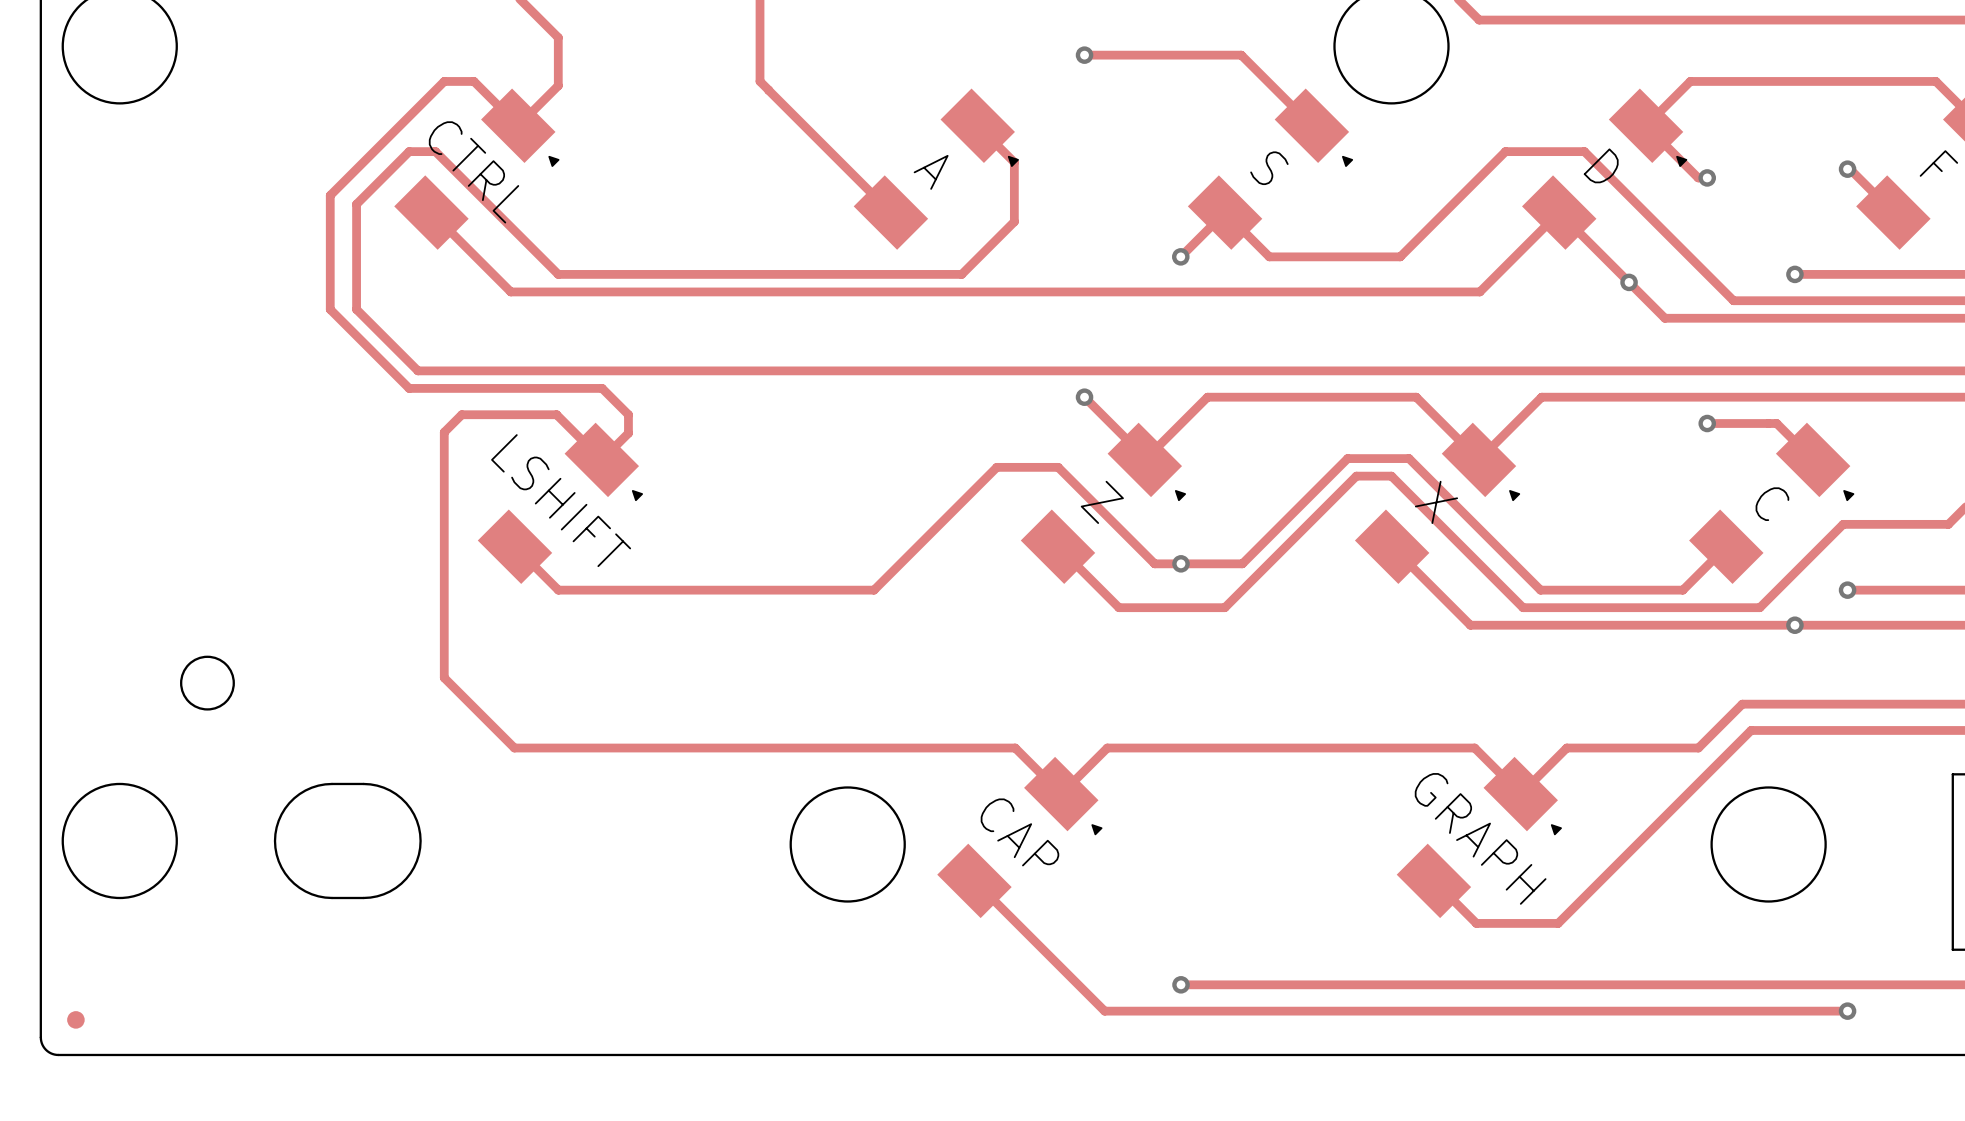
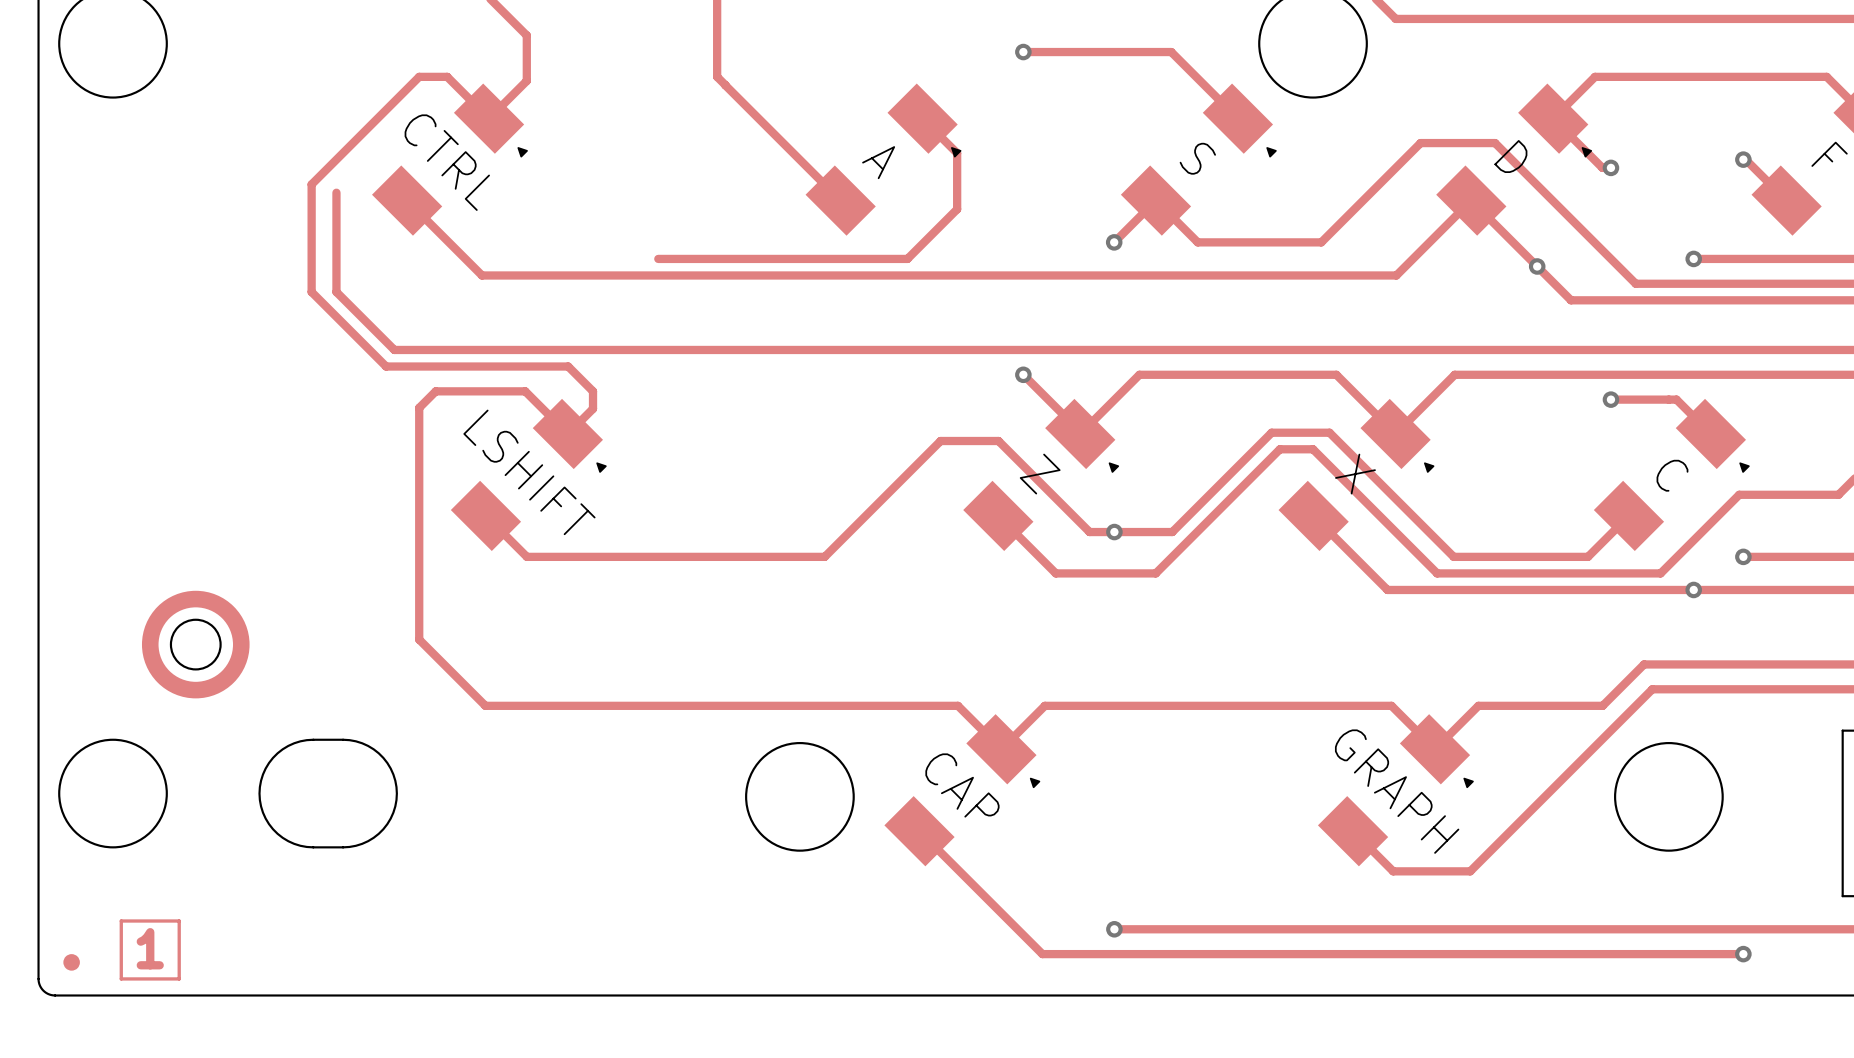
track: (356, 204) (409, 151) (435, 151) (558, 274) (697, 274) -> none
drawing: none -> [141, 590, 250, 699]
track: none -> (121, 921) (179, 921) (179, 978) (121, 978) (121, 921)
text: none -> 1 (150, 948)

